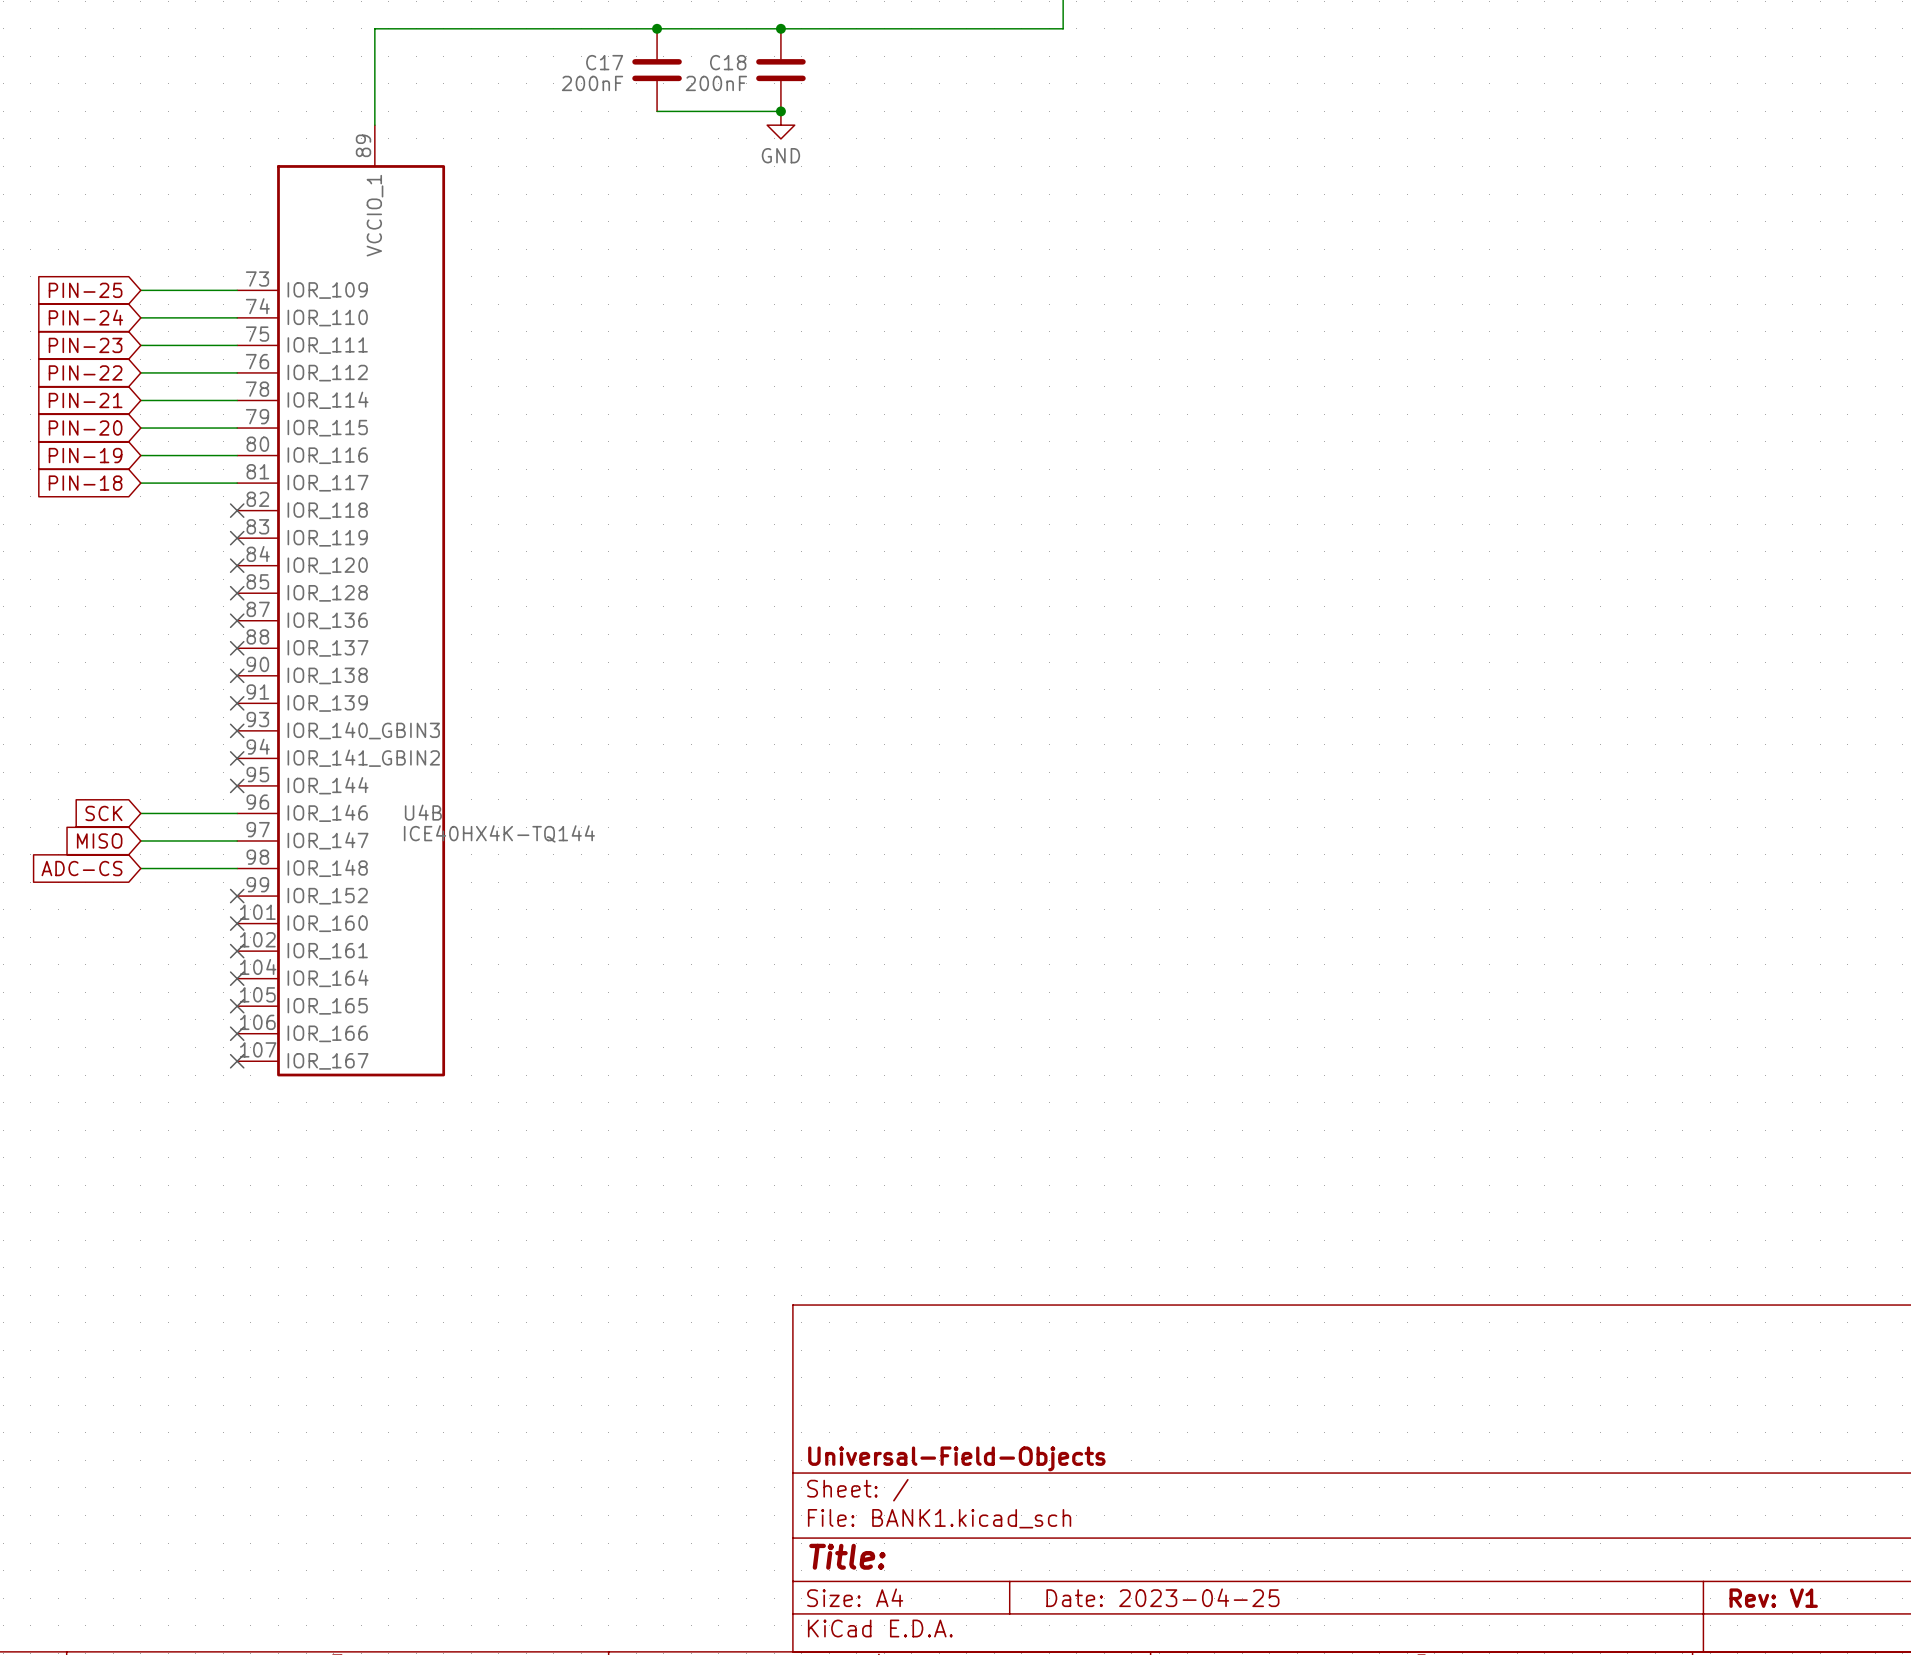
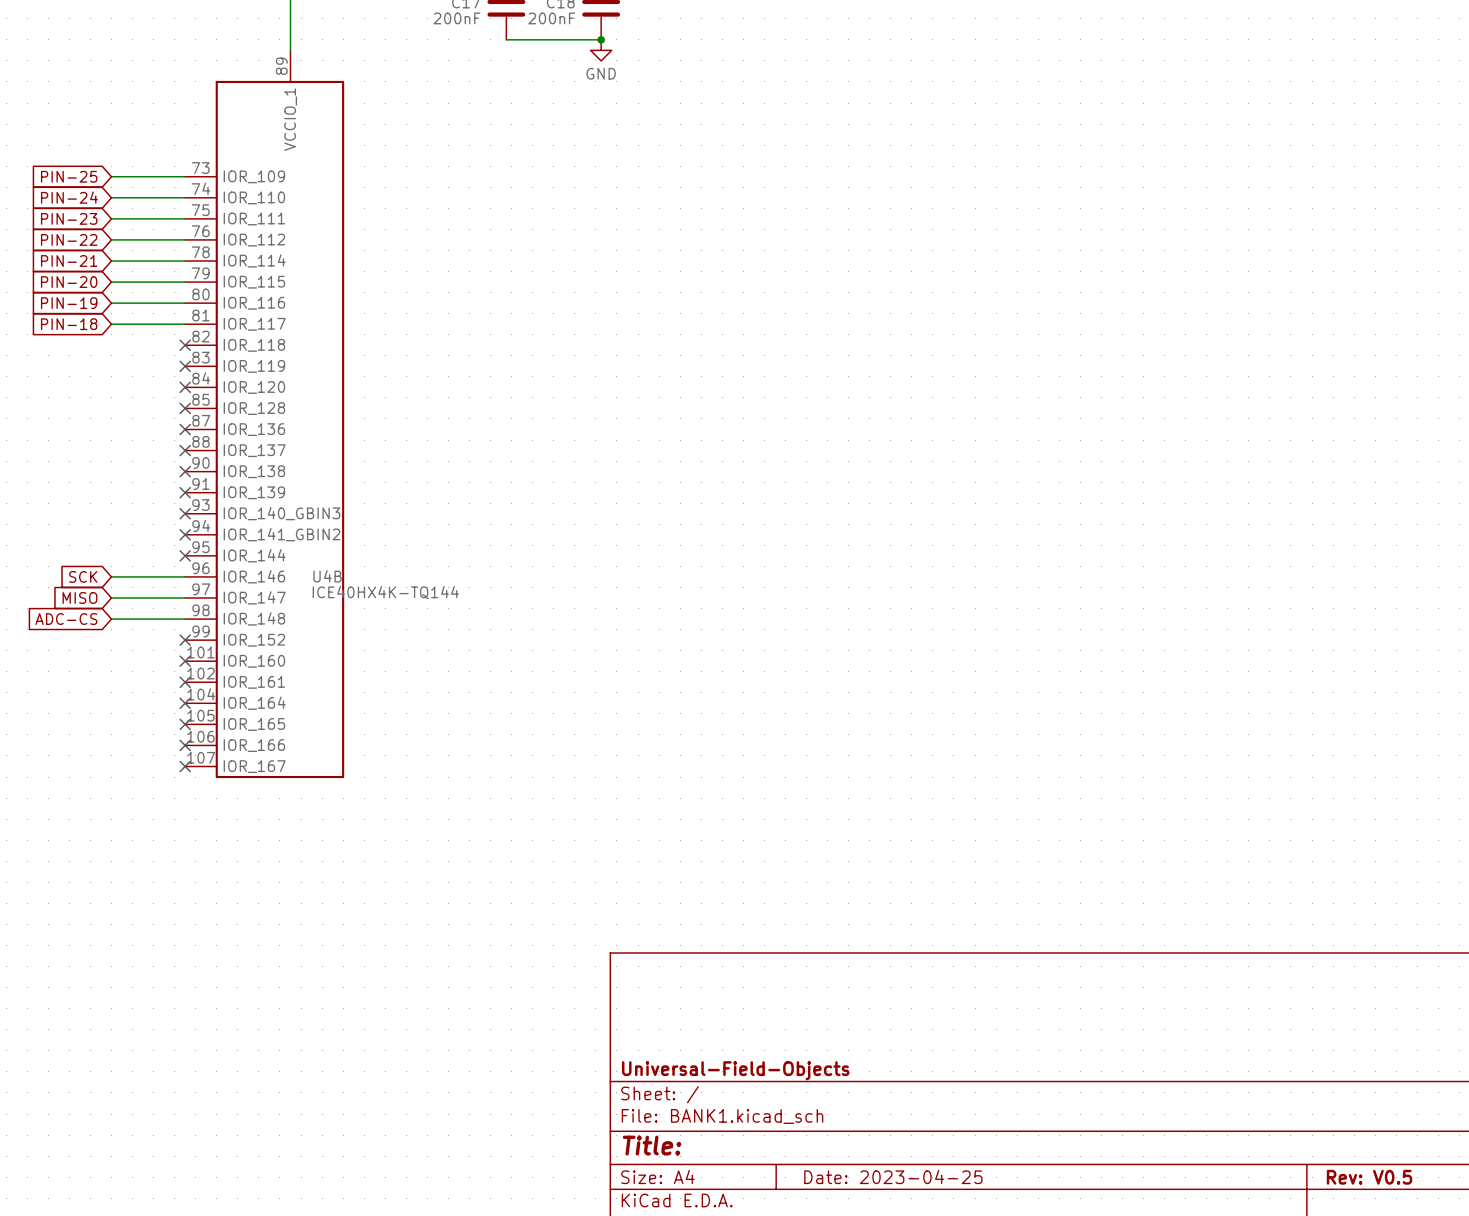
title block: Rev: V1 (1773, 1598) -> Rev: V0.5 (1369, 1177)

